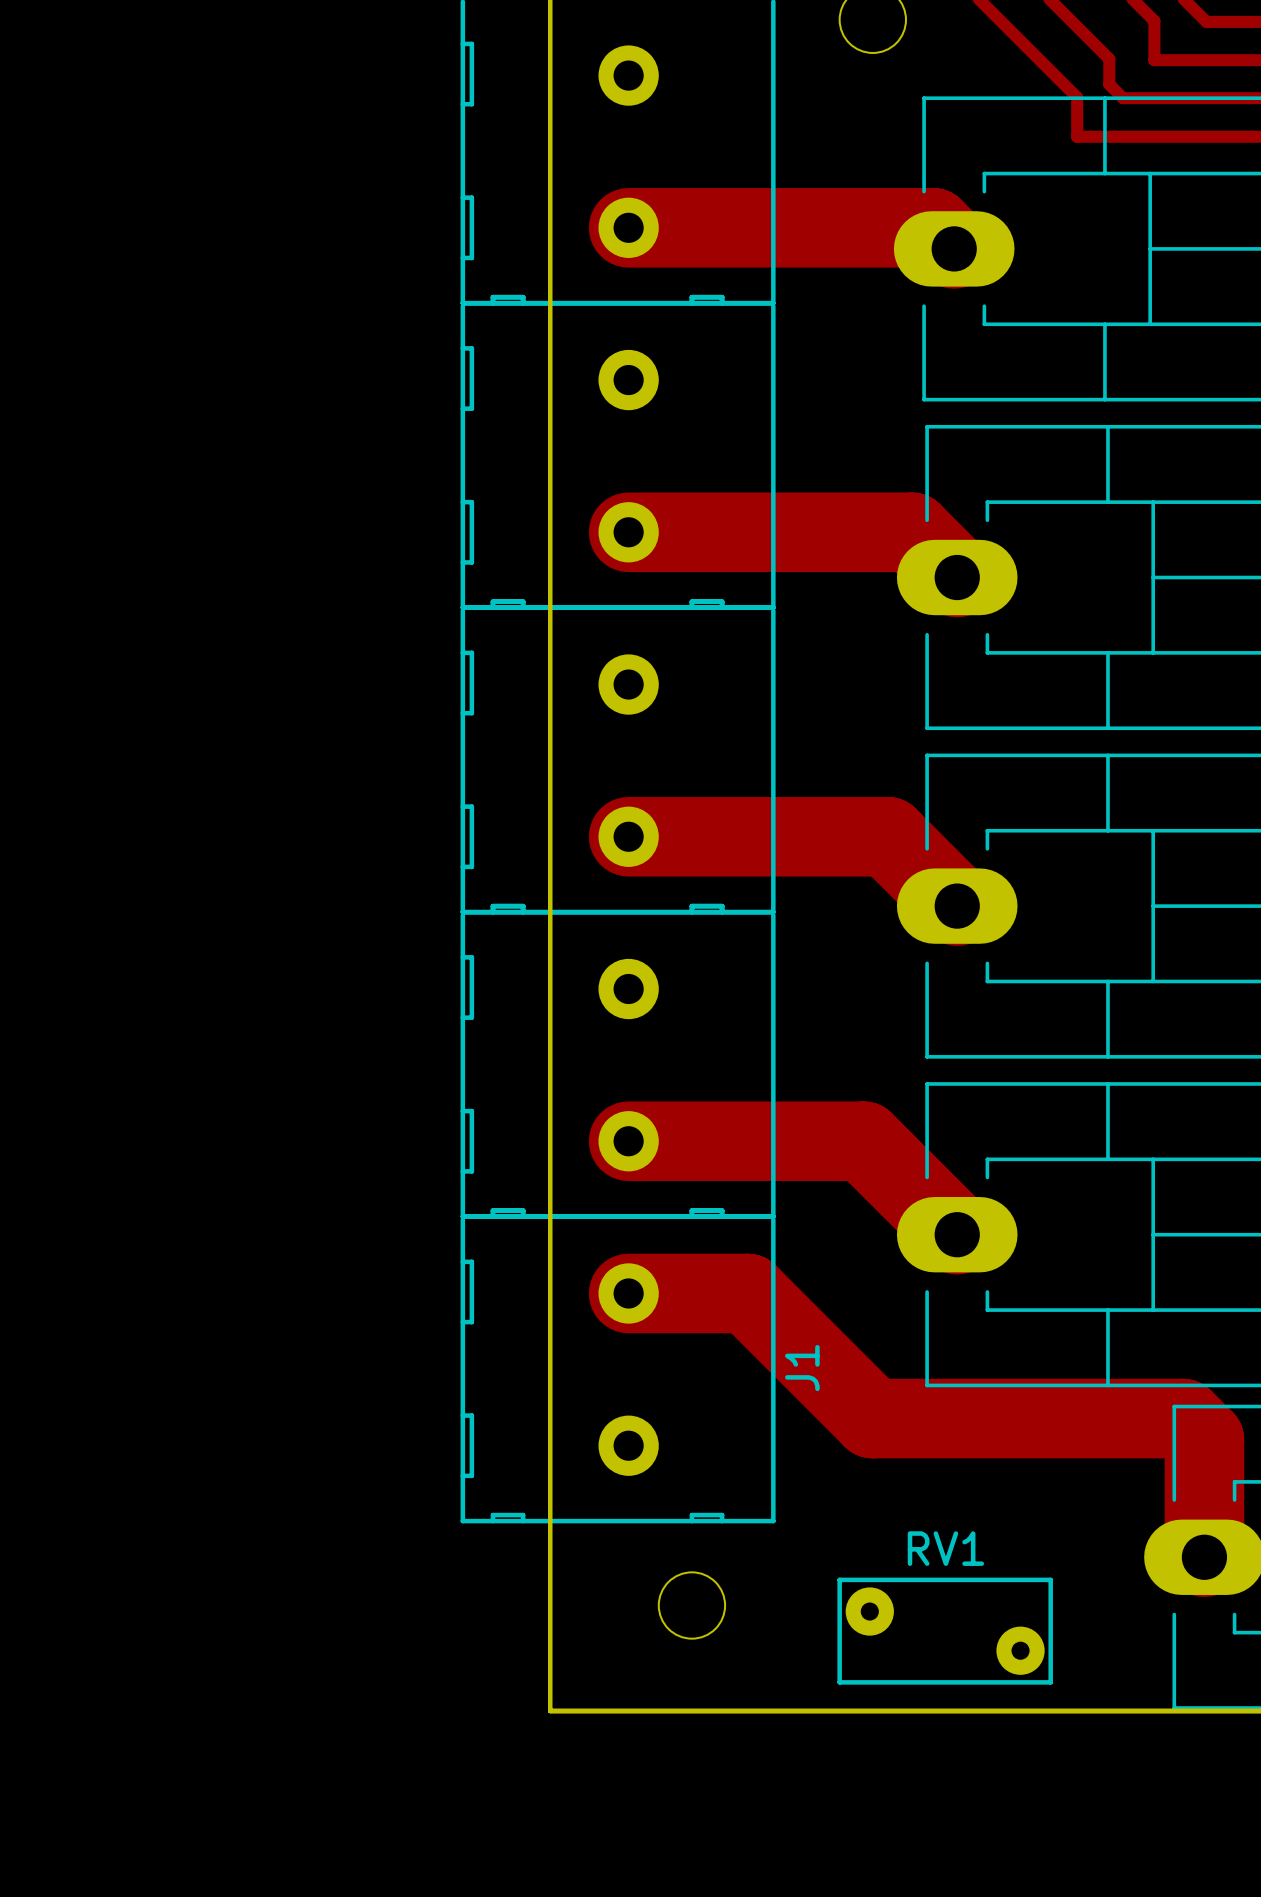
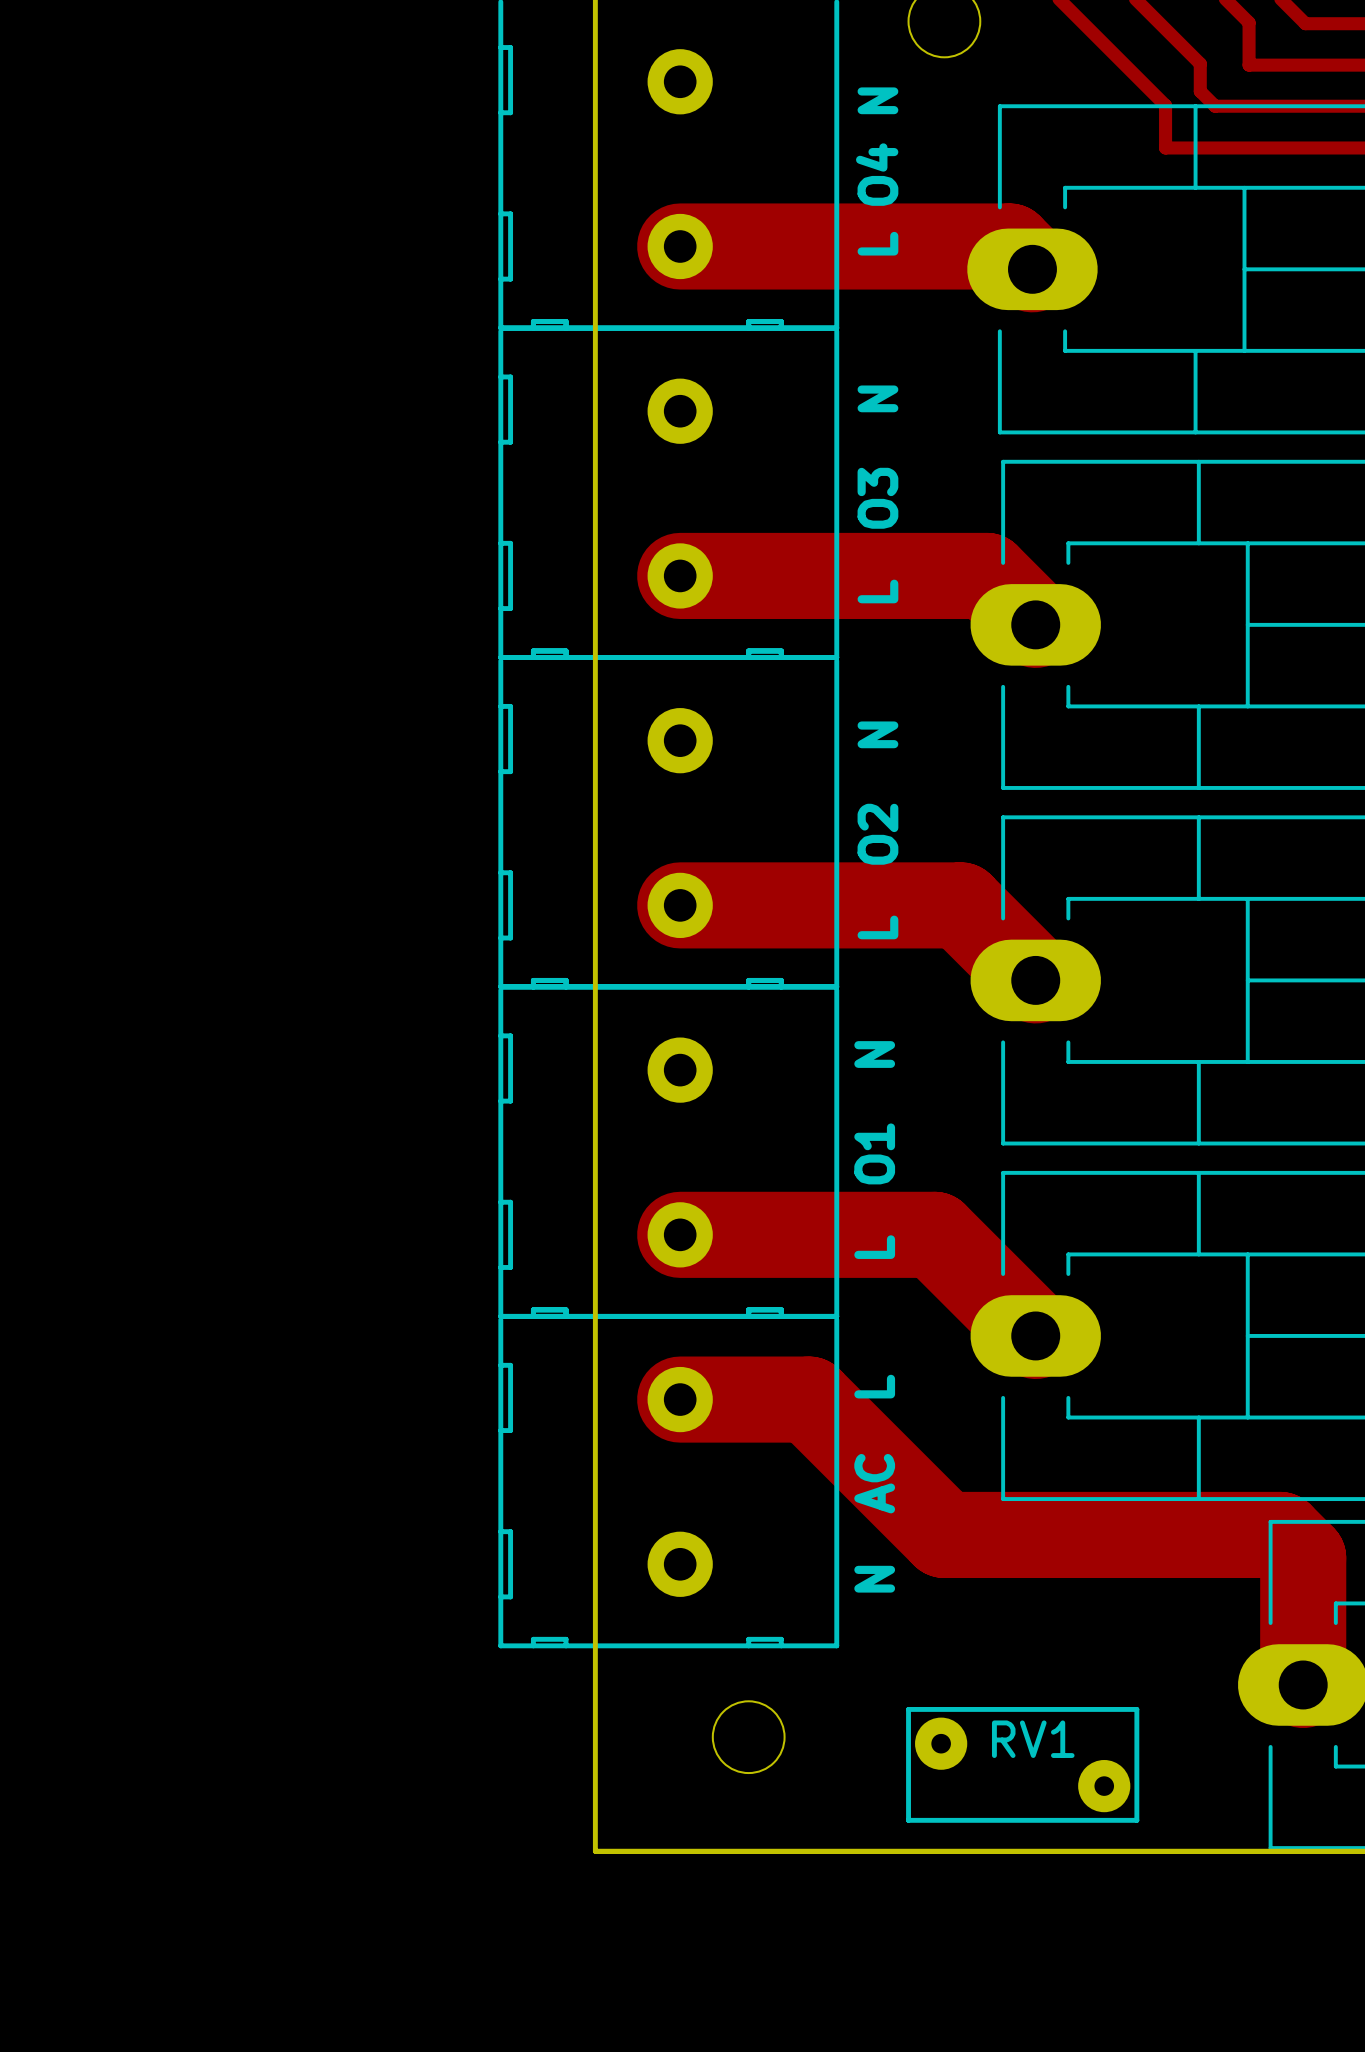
text: none -> L O4 N (877, 171)
text: none -> L O3 N (877, 494)
text: none -> L O2 N (877, 830)
text: none -> L O1 N (874, 1150)
J1 name: J1 (802, 1368) -> none
text: none -> N AC L (874, 1483)
RV1 name position: RV1 (945, 1548) -> RV1 (1033, 1739)

